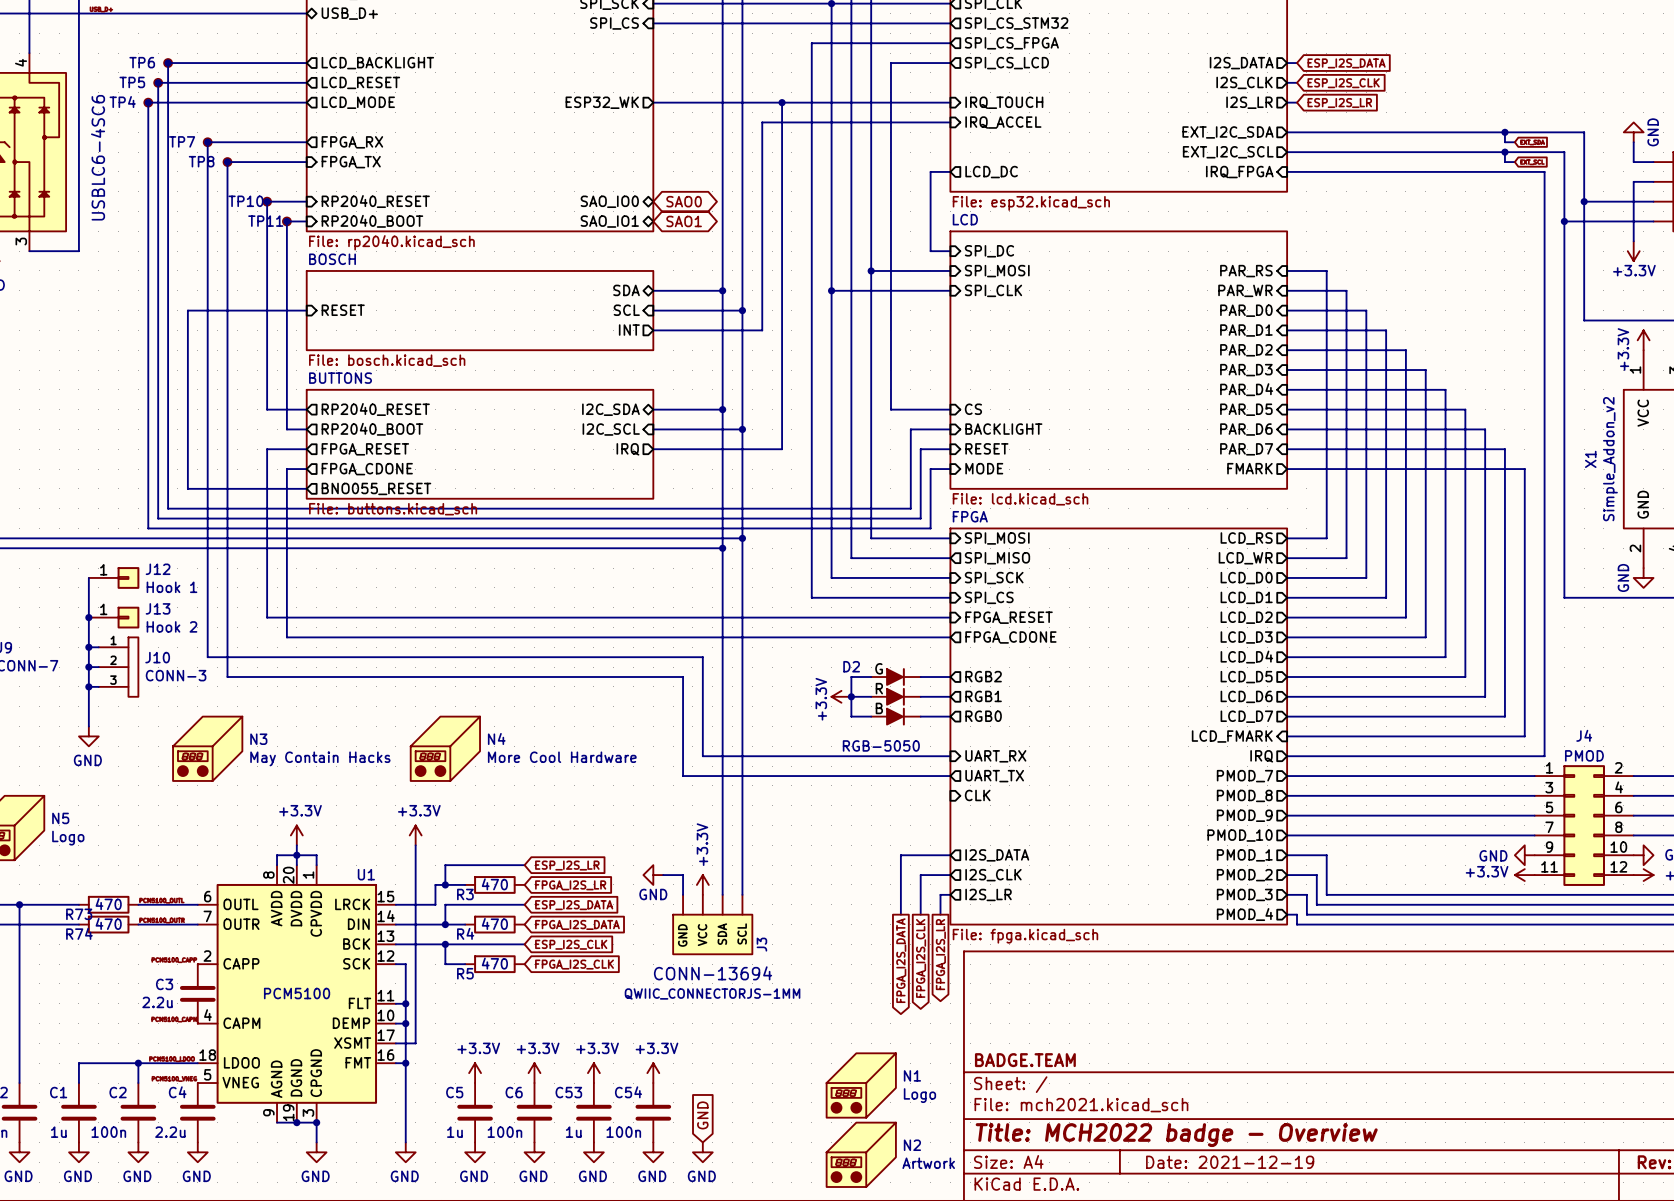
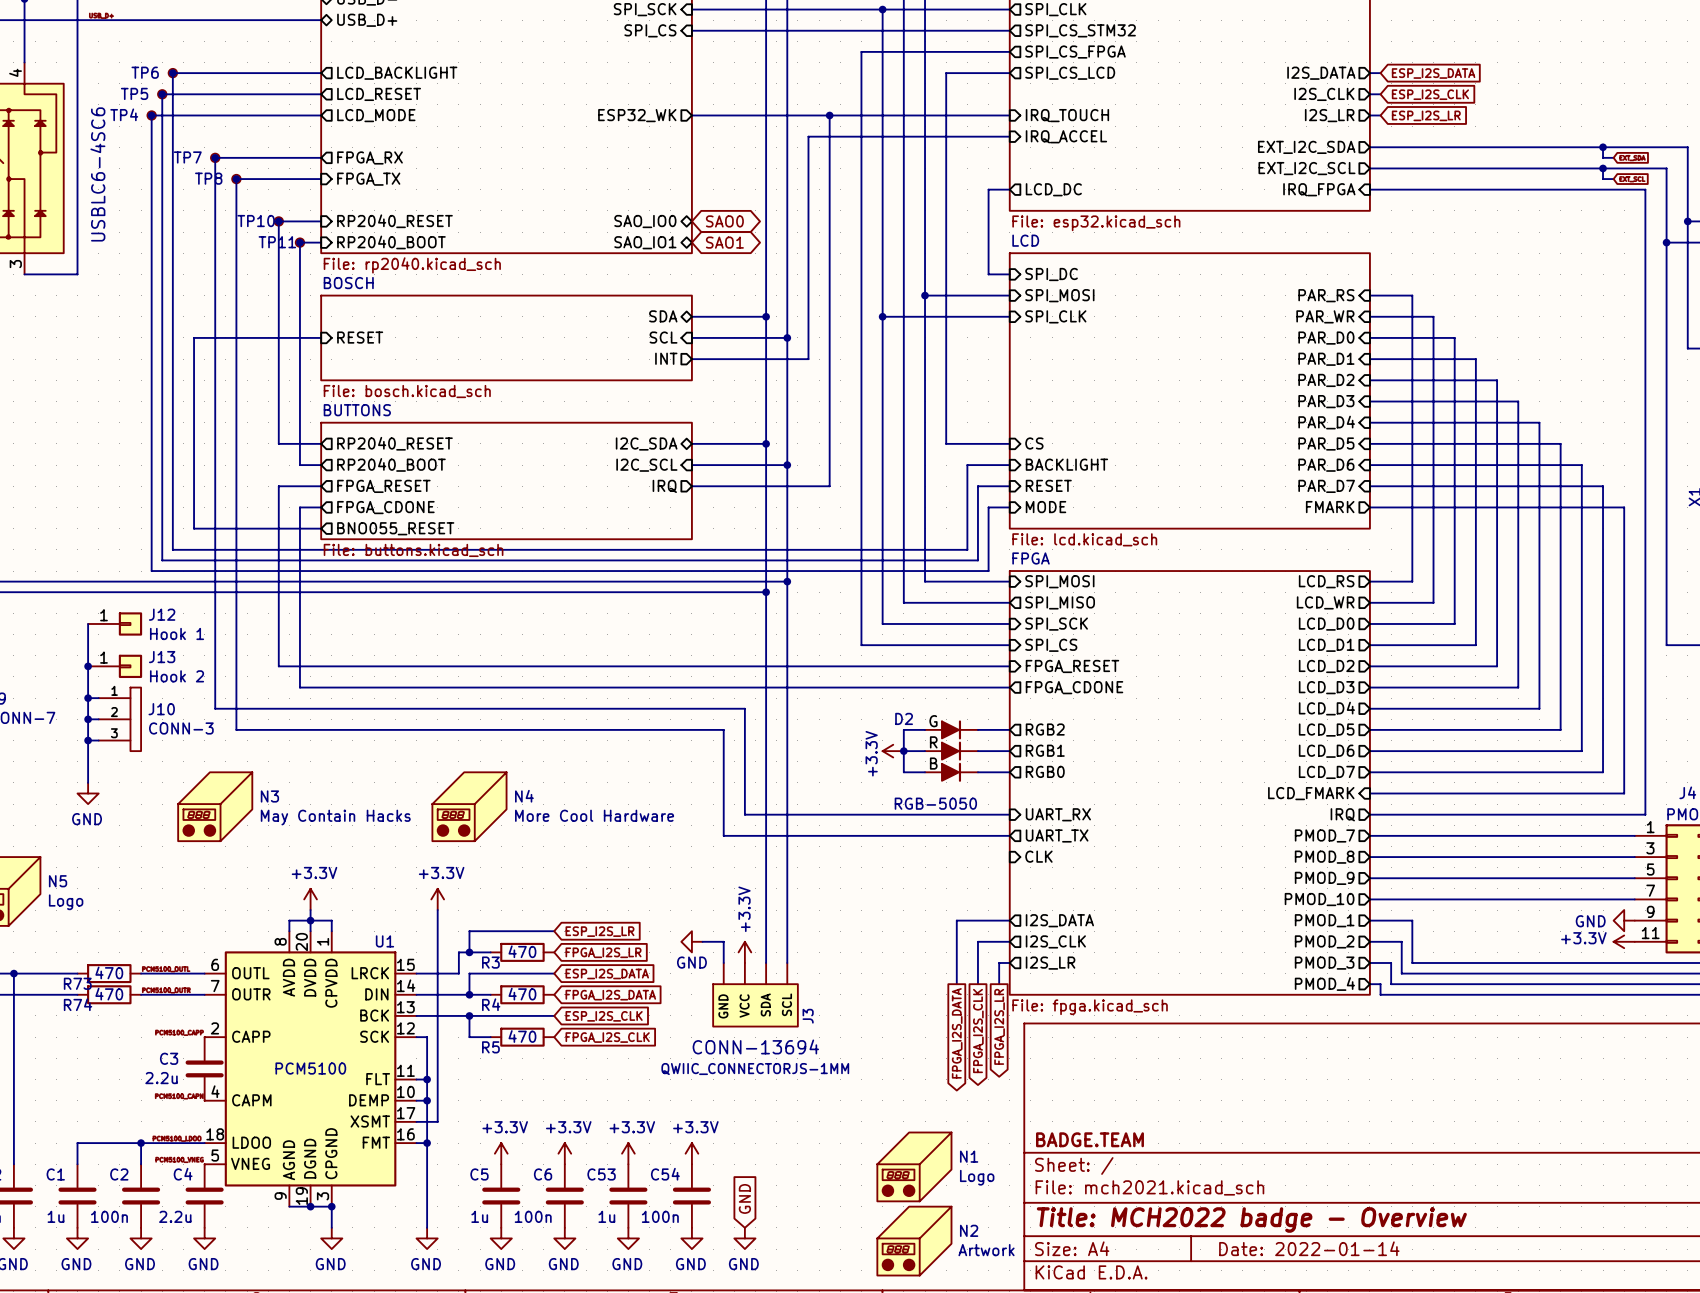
title block: Date: 2021-12-19 (1230, 1162) -> Date: 2022-01-14 (1309, 1248)

